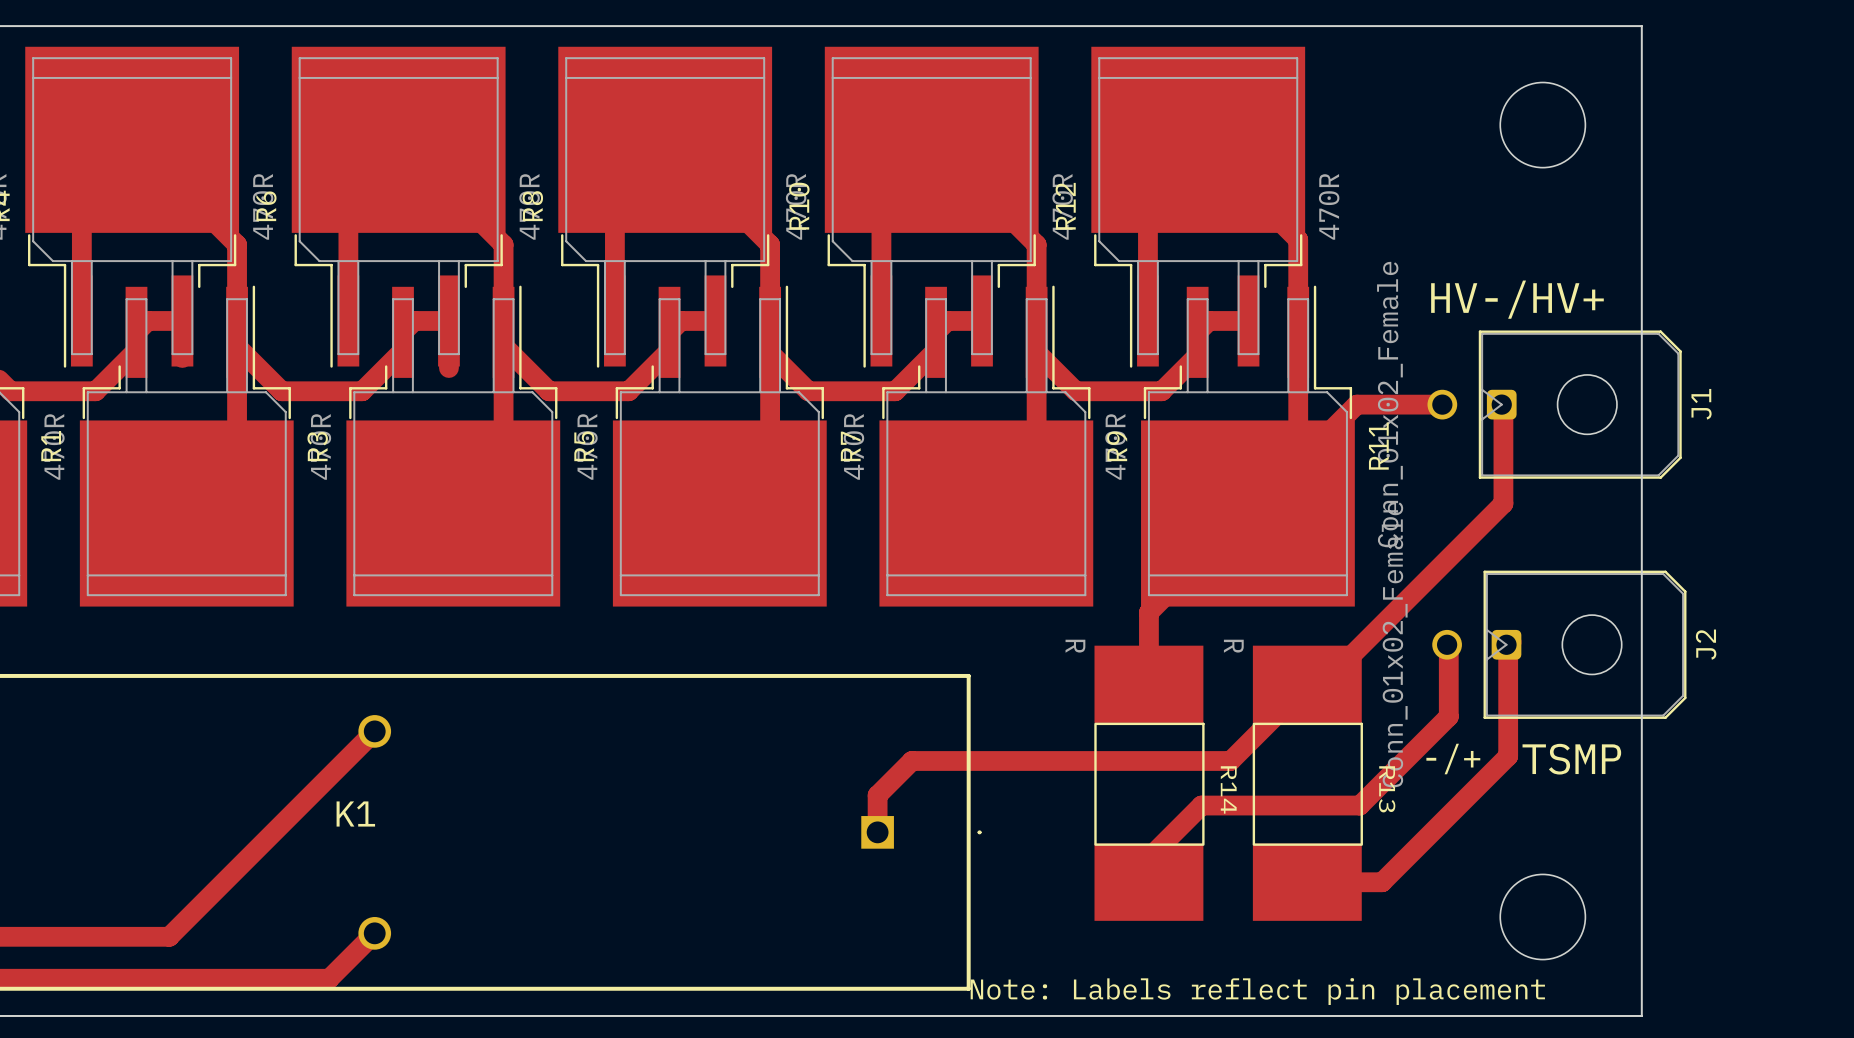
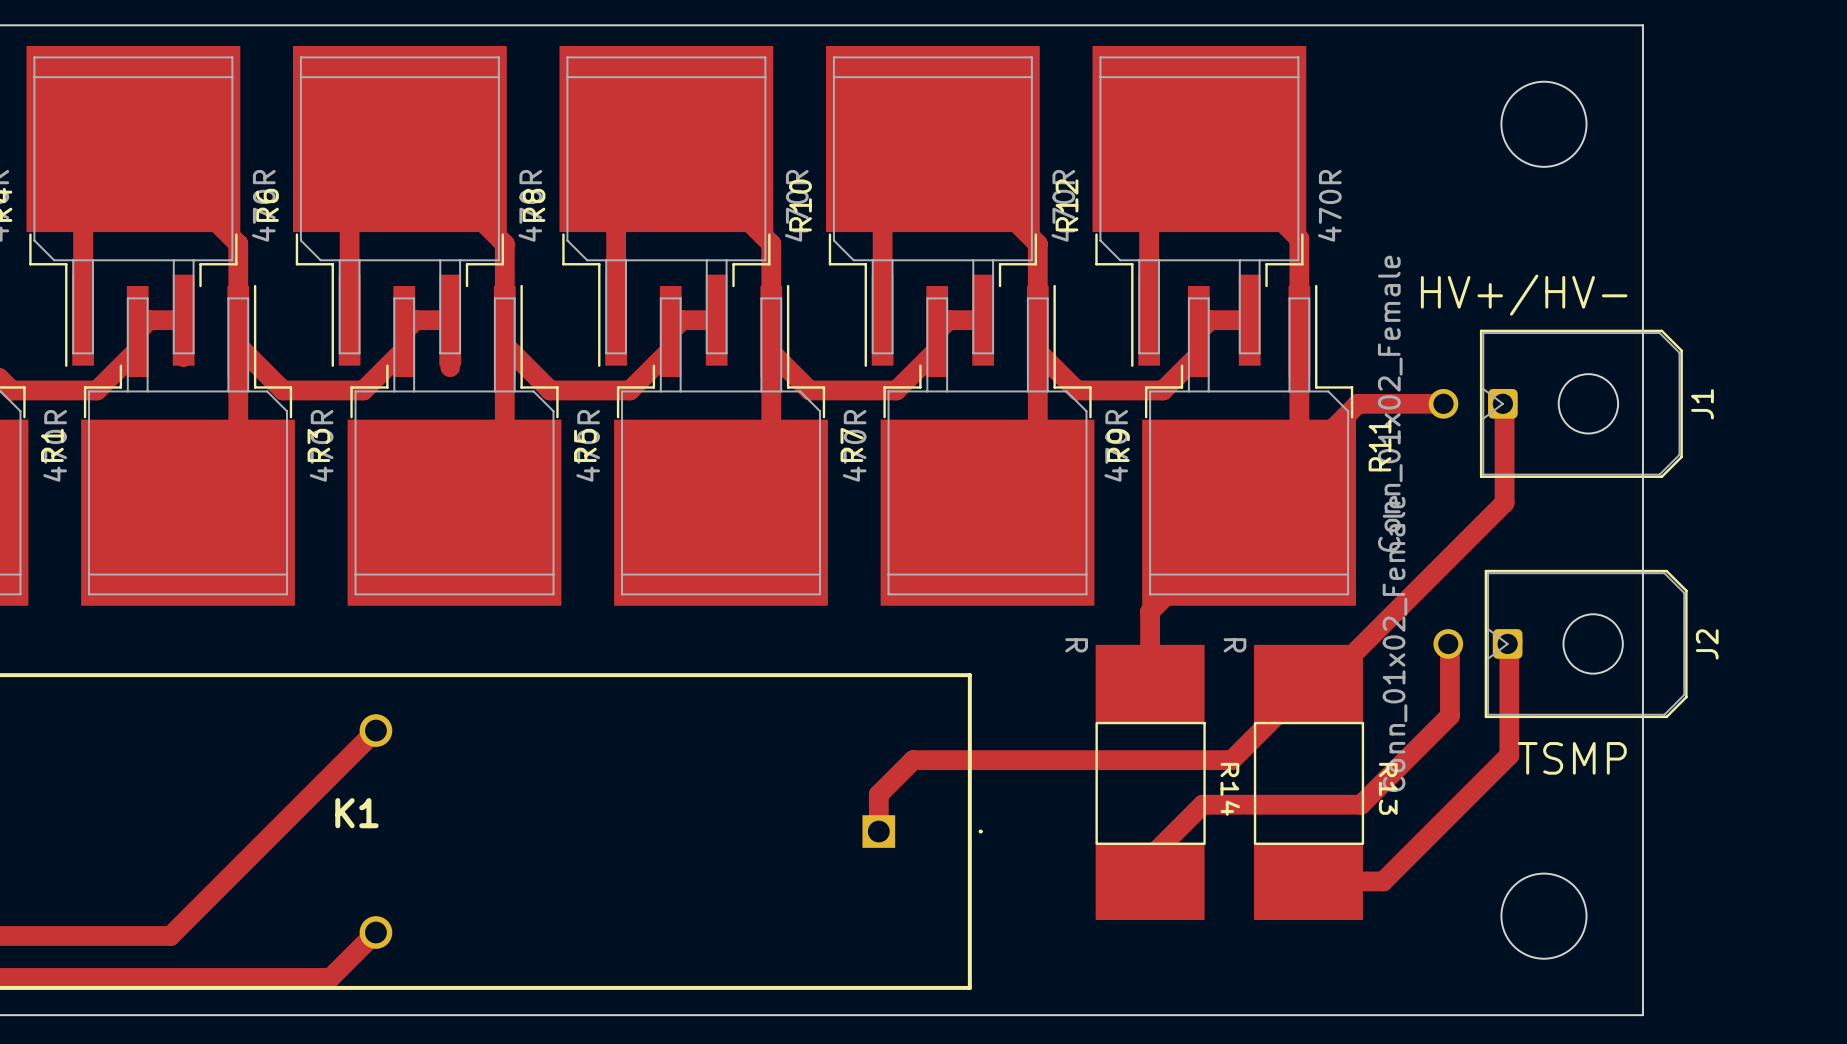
text: HV-/HV+ (1517, 299) -> HV+/HV- (1524, 295)
text: -/+ (1453, 759) -> none
text: Note: Labels reflect pin placement (1257, 991) -> none

